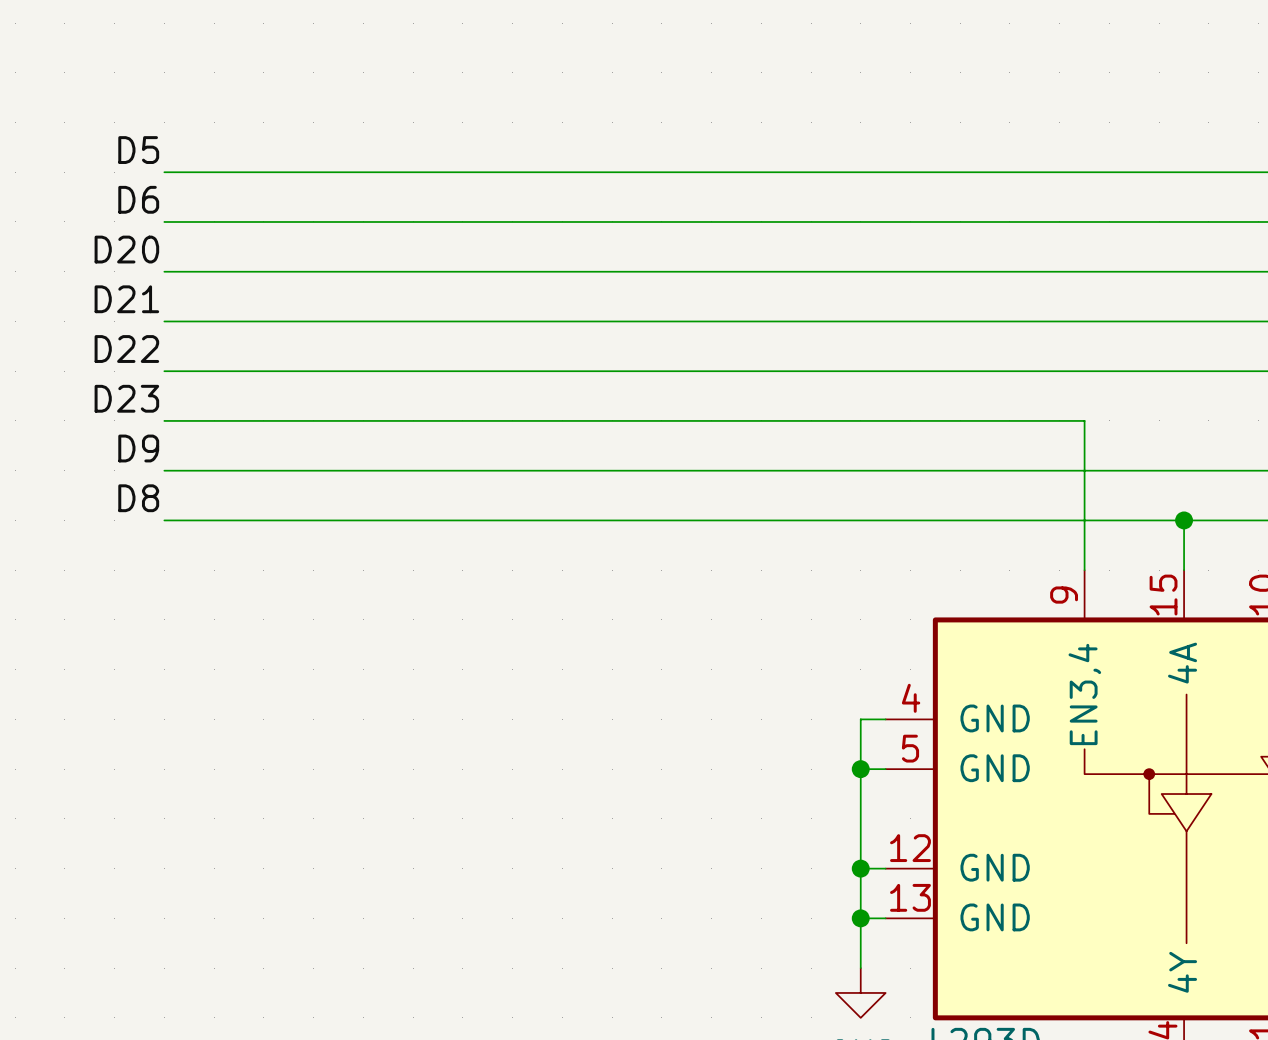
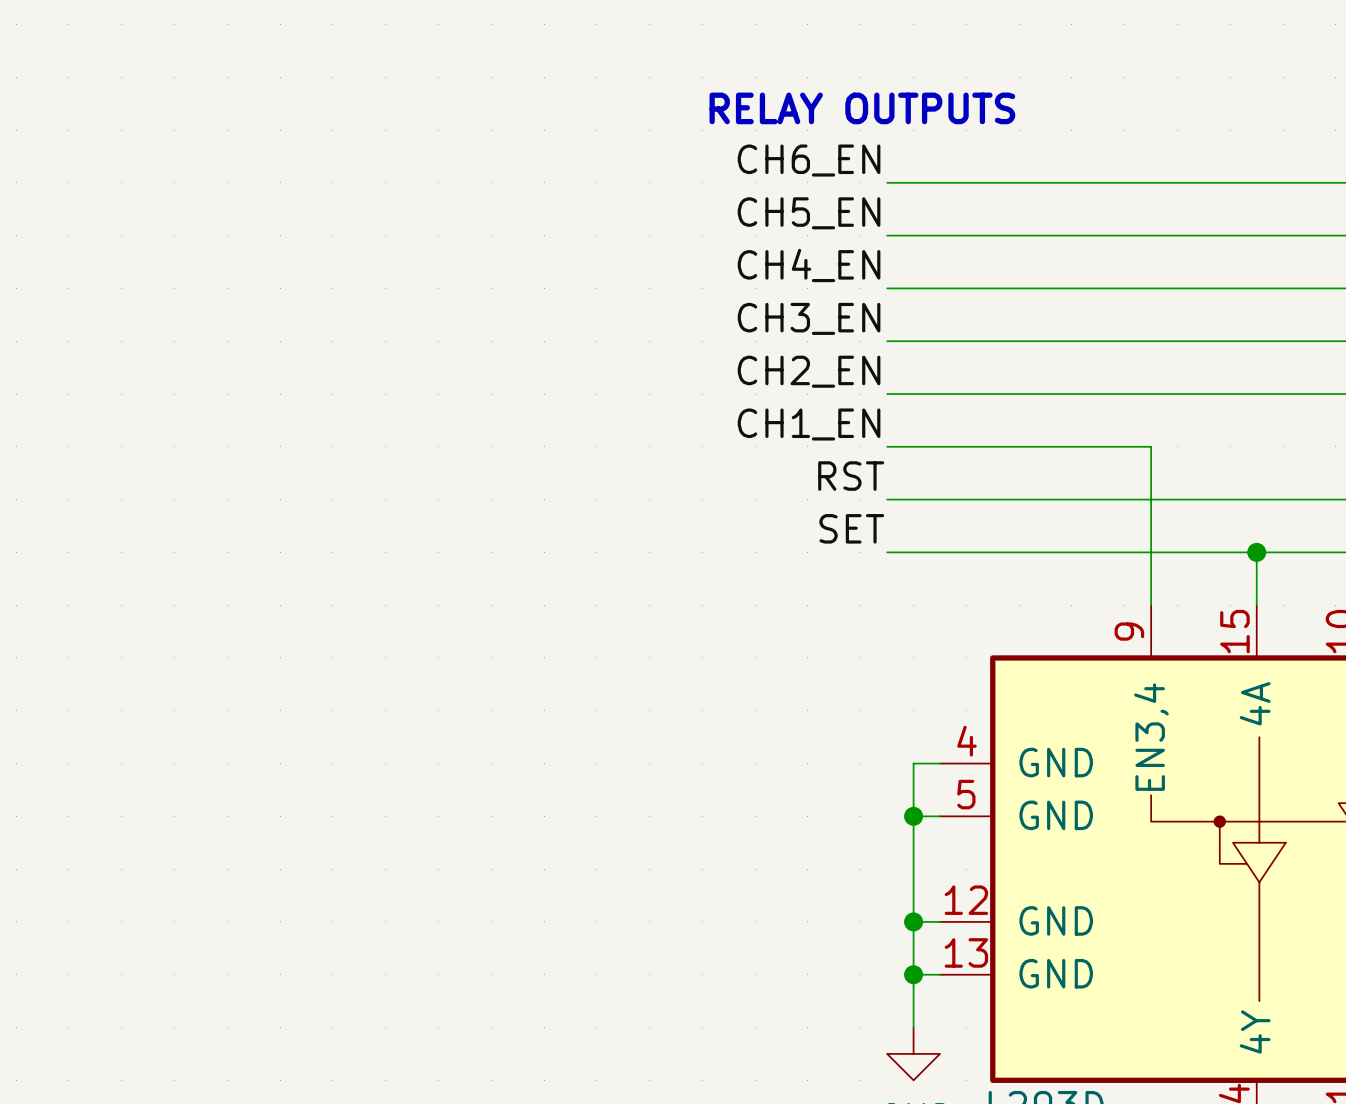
text: none -> RELAY OUTPUTS (862, 108)
label: D5 (138, 150) -> none
label: none -> CH6_EN (809, 160)
wire: (164, 172) (835, 172) -> none
label: D6 (138, 199) -> none
label: none -> CH5_EN (809, 213)
wire: (164, 221) (835, 221) -> none
label: D20 (126, 249) -> none
label: none -> CH4_EN (809, 265)
wire: (164, 271) (835, 271) -> none
label: D21 (126, 299) -> none
label: none -> CH3_EN (809, 318)
wire: (164, 321) (835, 321) -> none
label: D22 (126, 349) -> none
label: none -> CH2_EN (809, 371)
wire: (164, 371) (835, 371) -> none
label: D23 (126, 398) -> none
label: none -> CH1_EN (809, 424)
wire: (164, 420) (835, 420) -> none
label: D9 (138, 448) -> none
label: none -> RST (851, 476)
wire: (164, 470) (835, 470) -> none
label: D8 (138, 498) -> none
label: none -> SET (851, 528)
wire: (164, 520) (835, 520) -> none

